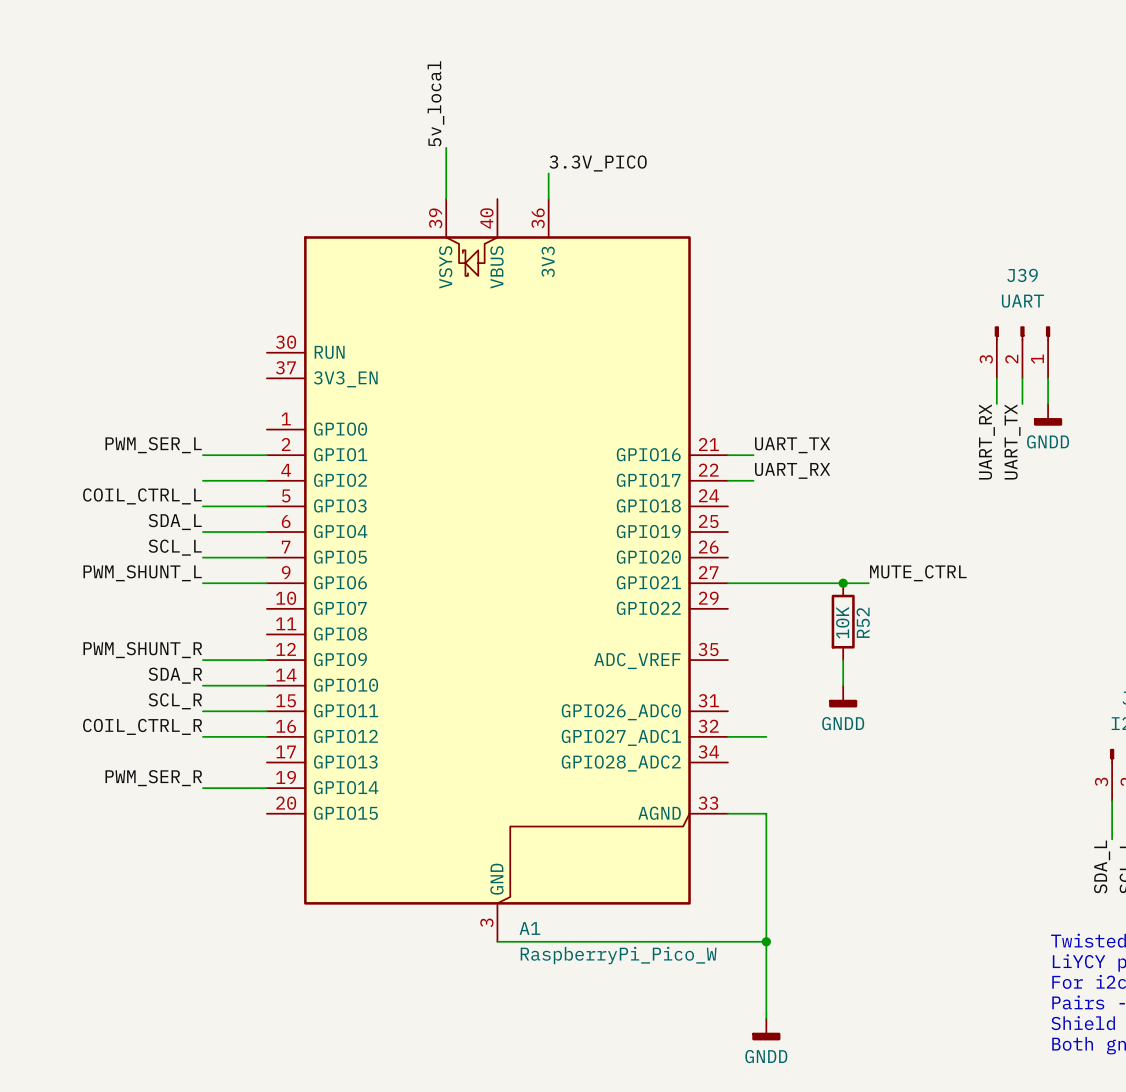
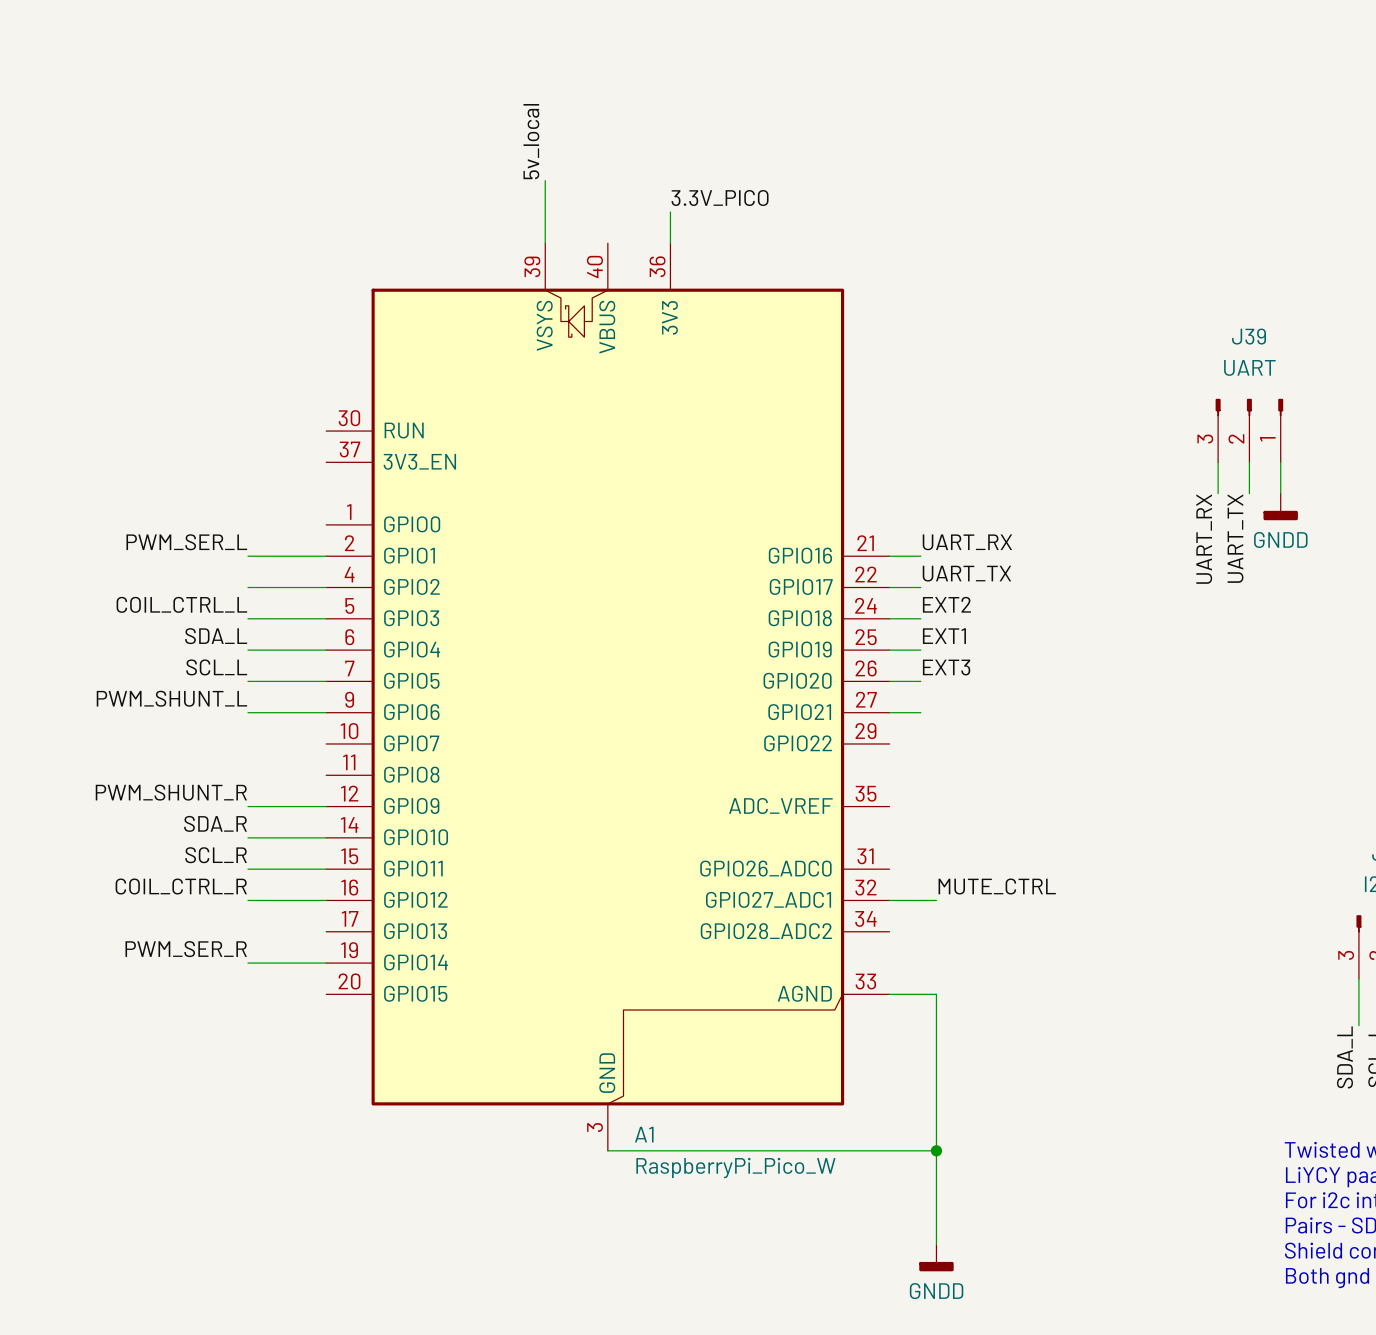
label: UART_TX (792, 445) -> UART_RX (967, 542)
label: UART_RX (792, 470) -> UART_TX (966, 573)
label: none -> EXT2 (946, 604)
wire: none -> (889, 618) (920, 618)
label: none -> EXT1 (944, 636)
wire: none -> (889, 650) (920, 650)
label: none -> EXT3 (946, 667)
wire: none -> (889, 681) (920, 681)
label position: MUTE_CTRL (918, 573) -> MUTE_CTRL (997, 886)
wire: (753, 583) (868, 583) -> none
junction: (843, 583) -> none
R52: 10K (843, 621) -> none
wire: (843, 660) (843, 685) -> none
power symbol: GNDD (843, 696) -> none

